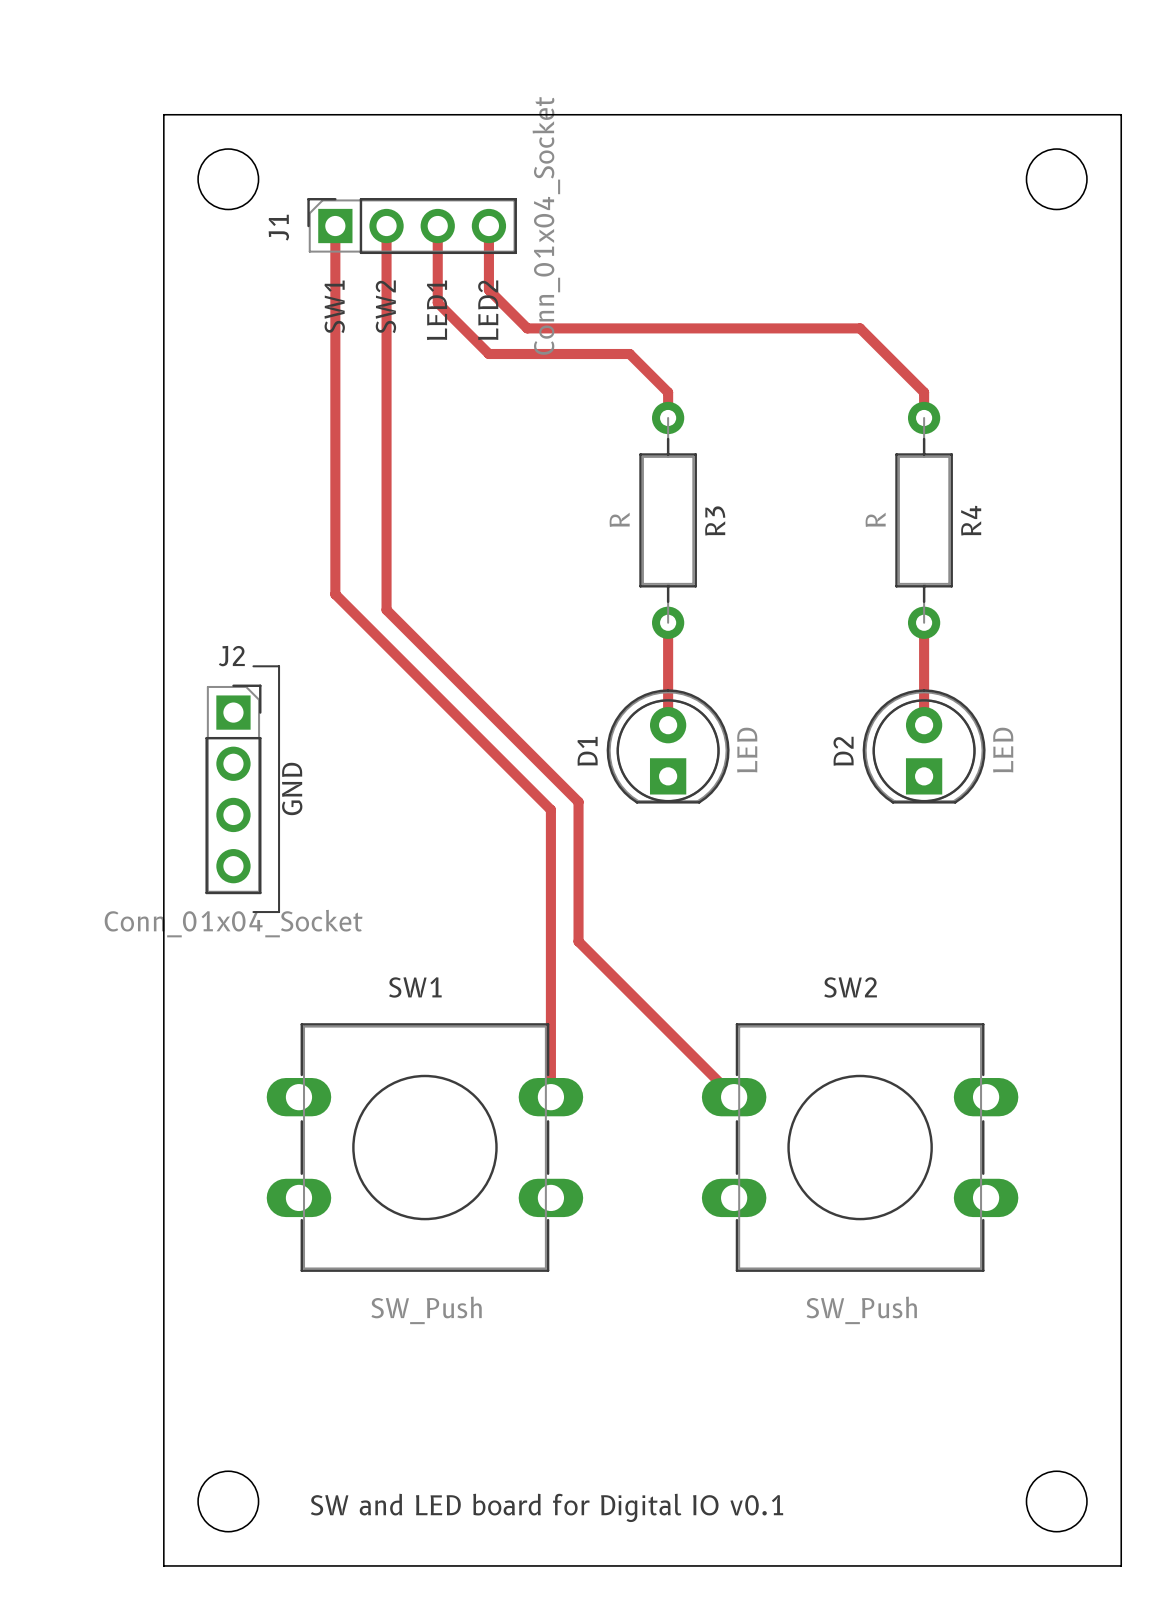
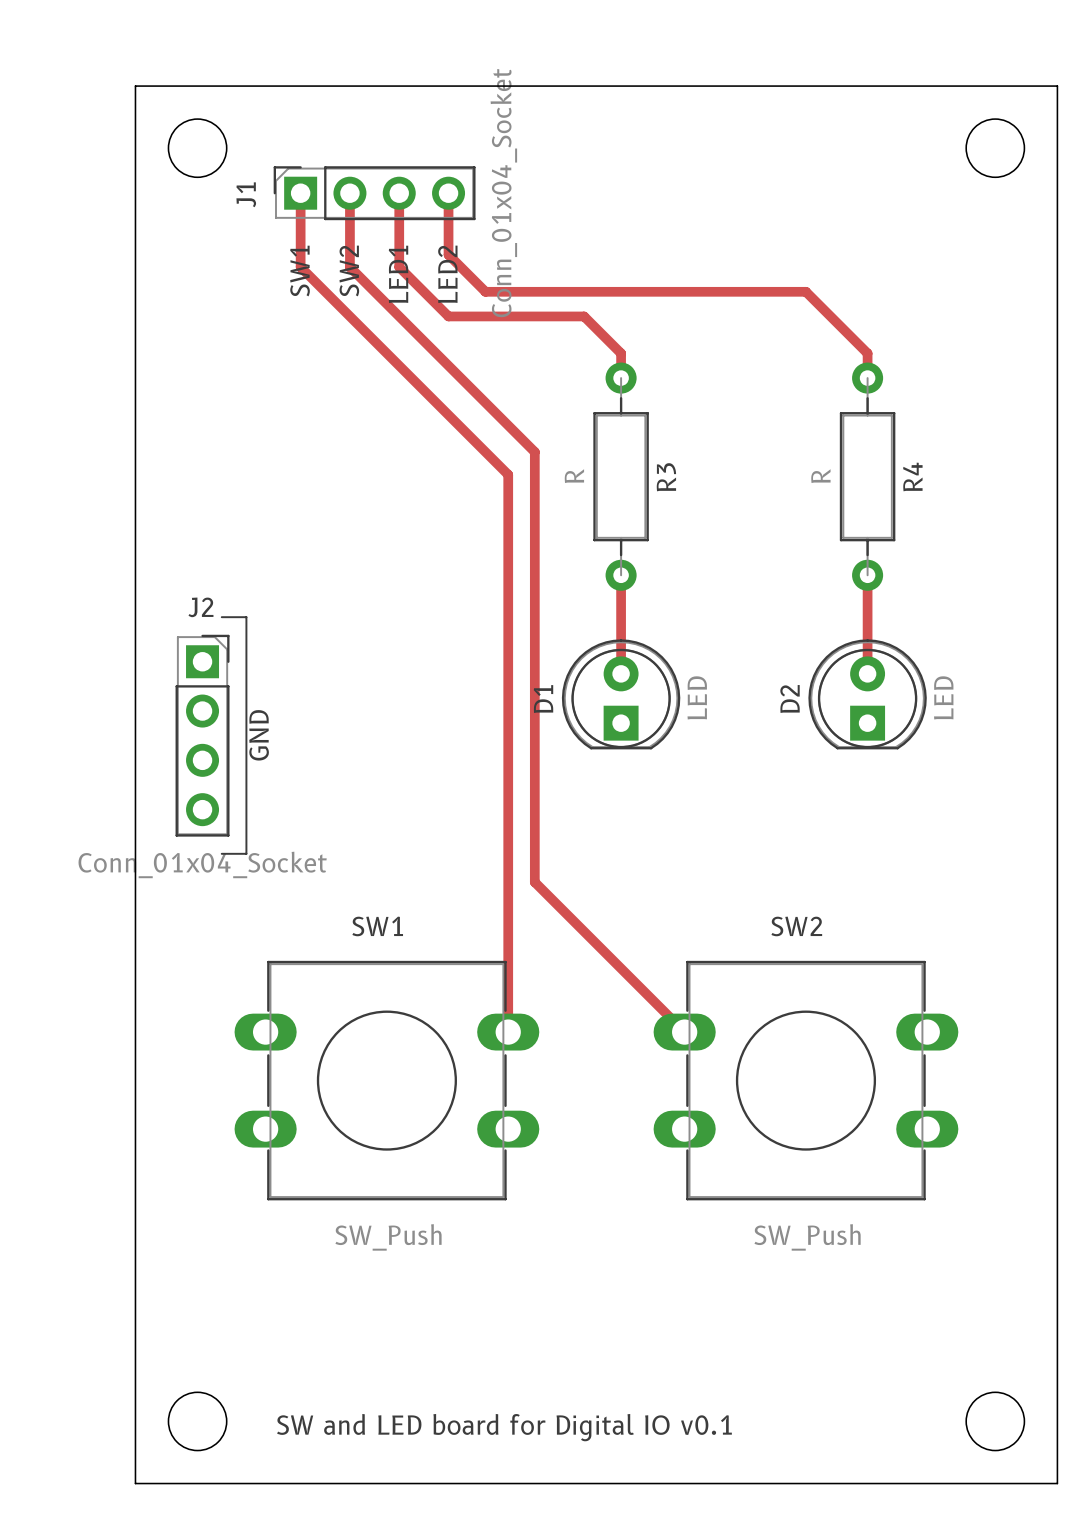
track: (335, 302) (335, 594) (550, 809) -> (300, 267) (508, 474) (508, 755)
track: (386, 302) (386, 609) (578, 801) -> (349, 267) (534, 452) (534, 747)

